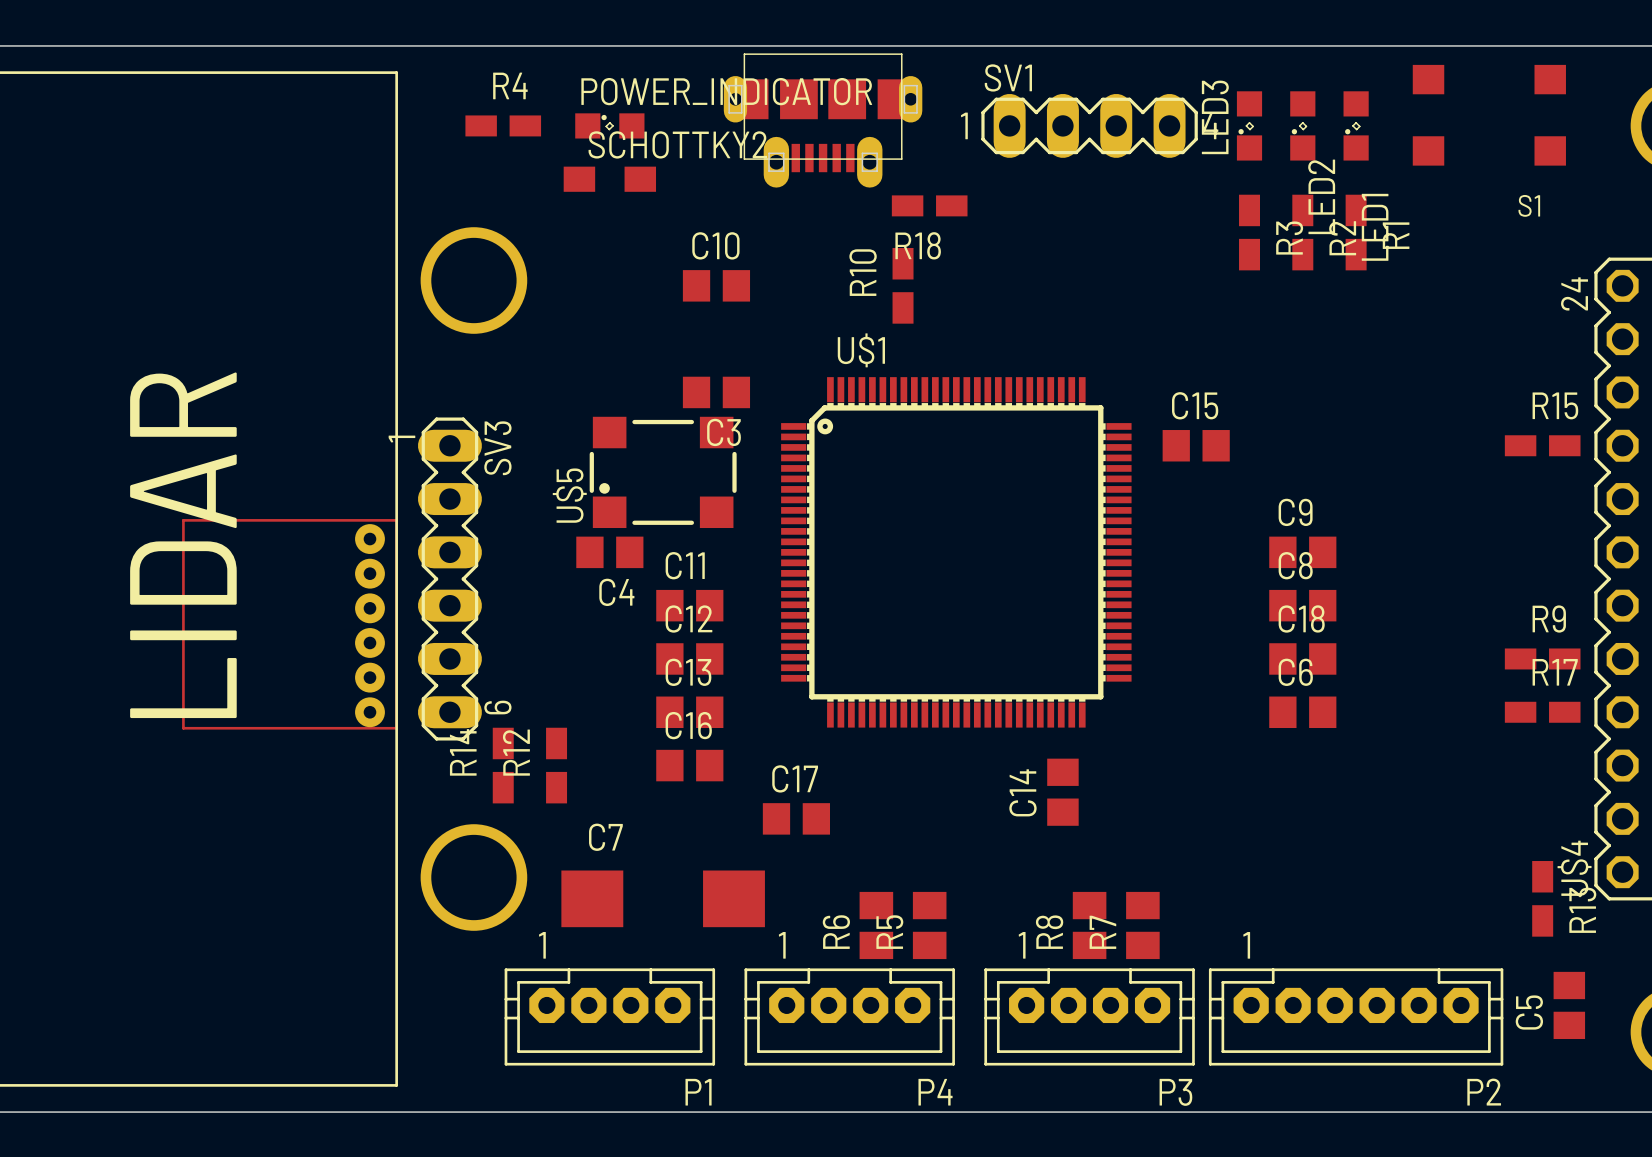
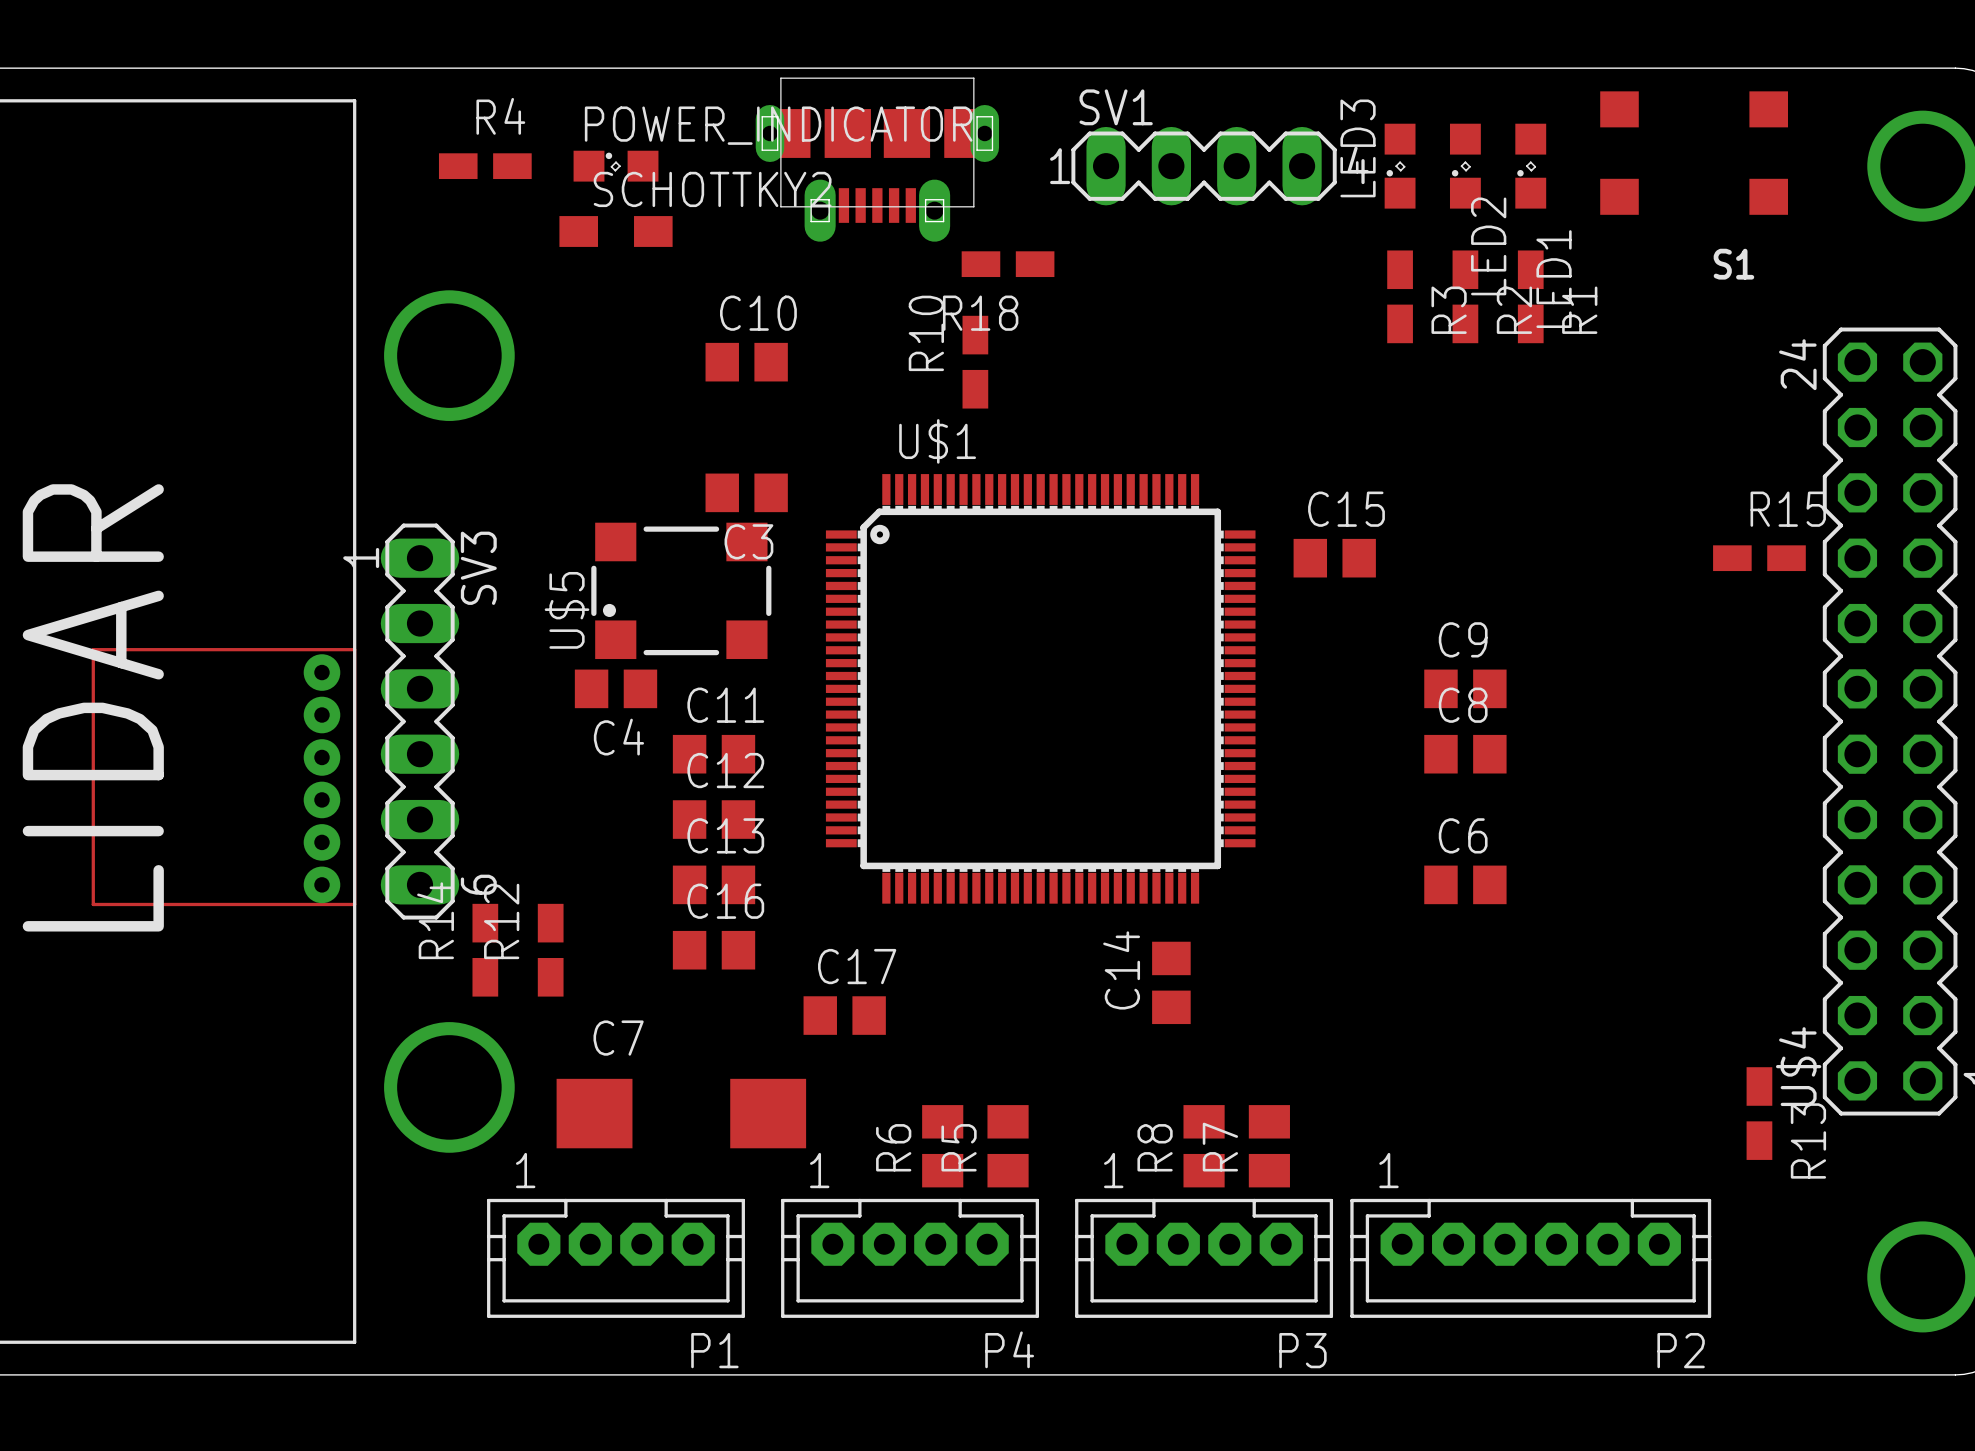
C18: (1302, 658) -> none
R9: (1542, 658) -> none
R17: (1542, 712) -> none
C5: (1569, 1005) -> none

